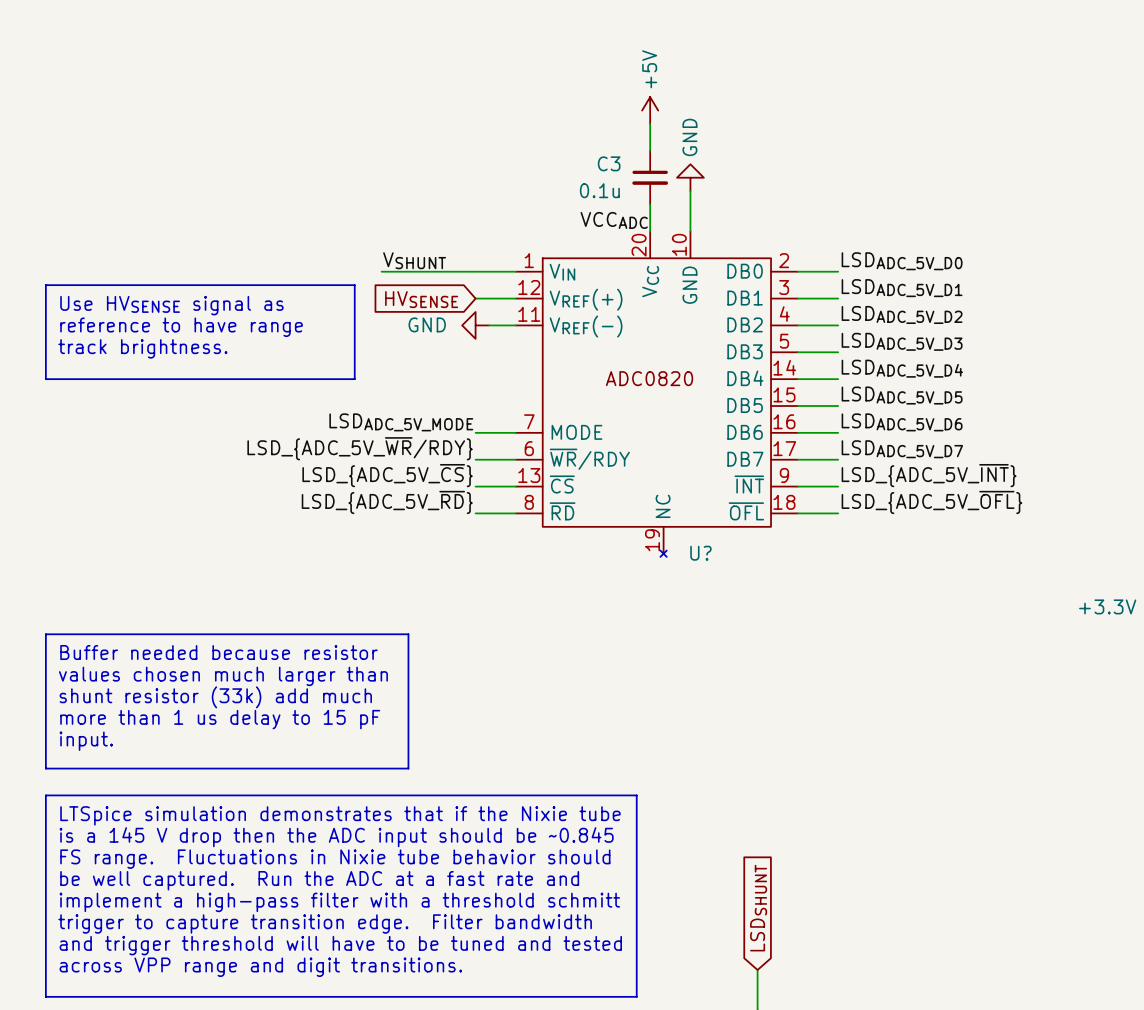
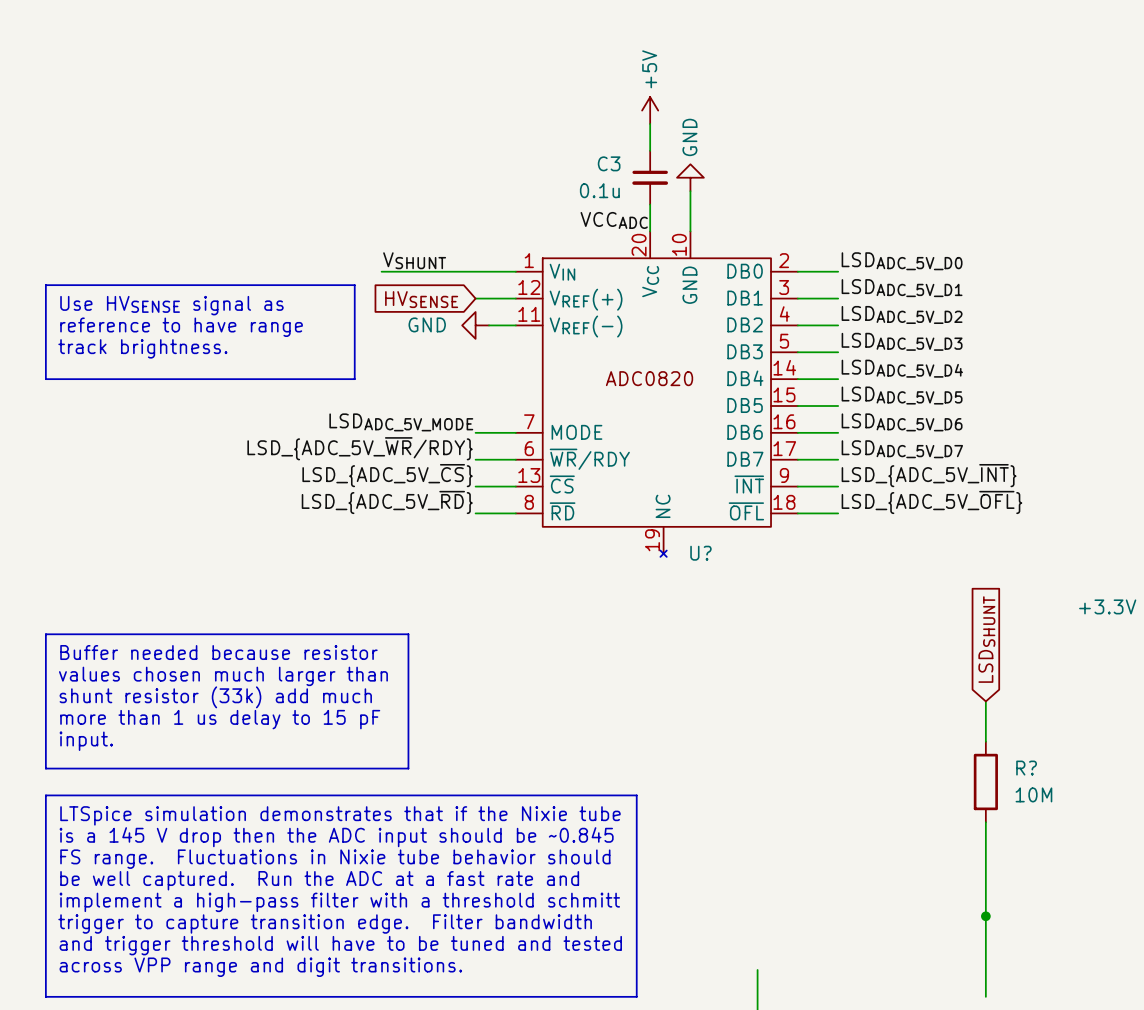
global label: none -> LSDSHUNT (986, 639)
wire: none -> (985, 701) (985, 741)
R?: none -> 10M (985, 781)
wire: none -> (985, 822) (985, 996)
global label: LSDSHUNT (758, 908) -> none
junction: none -> (985, 916)

